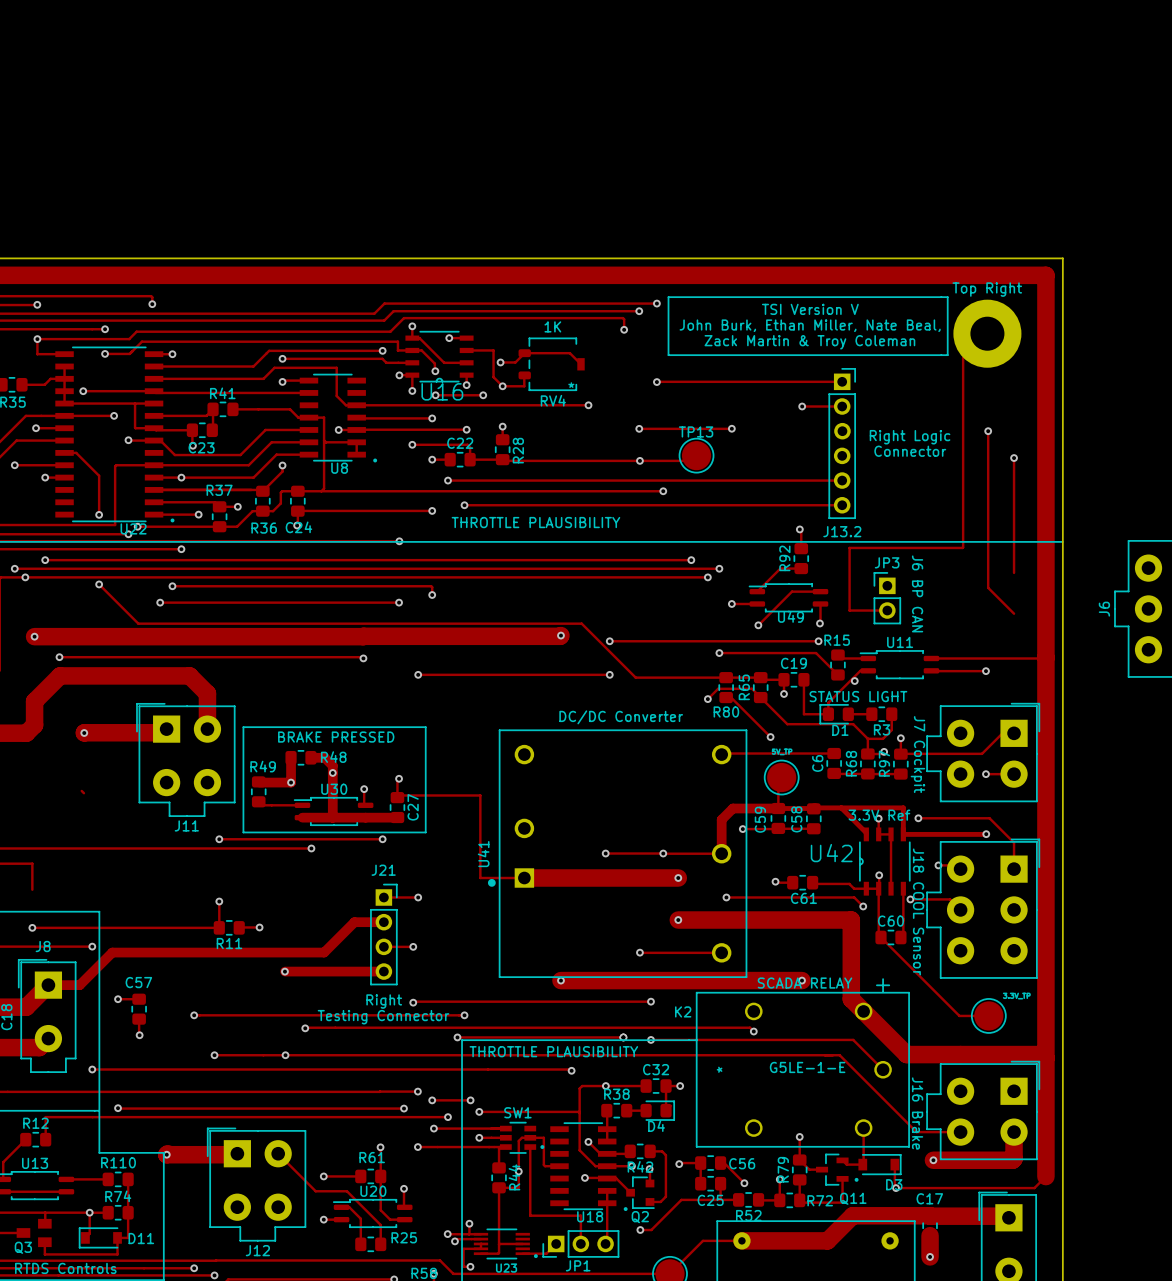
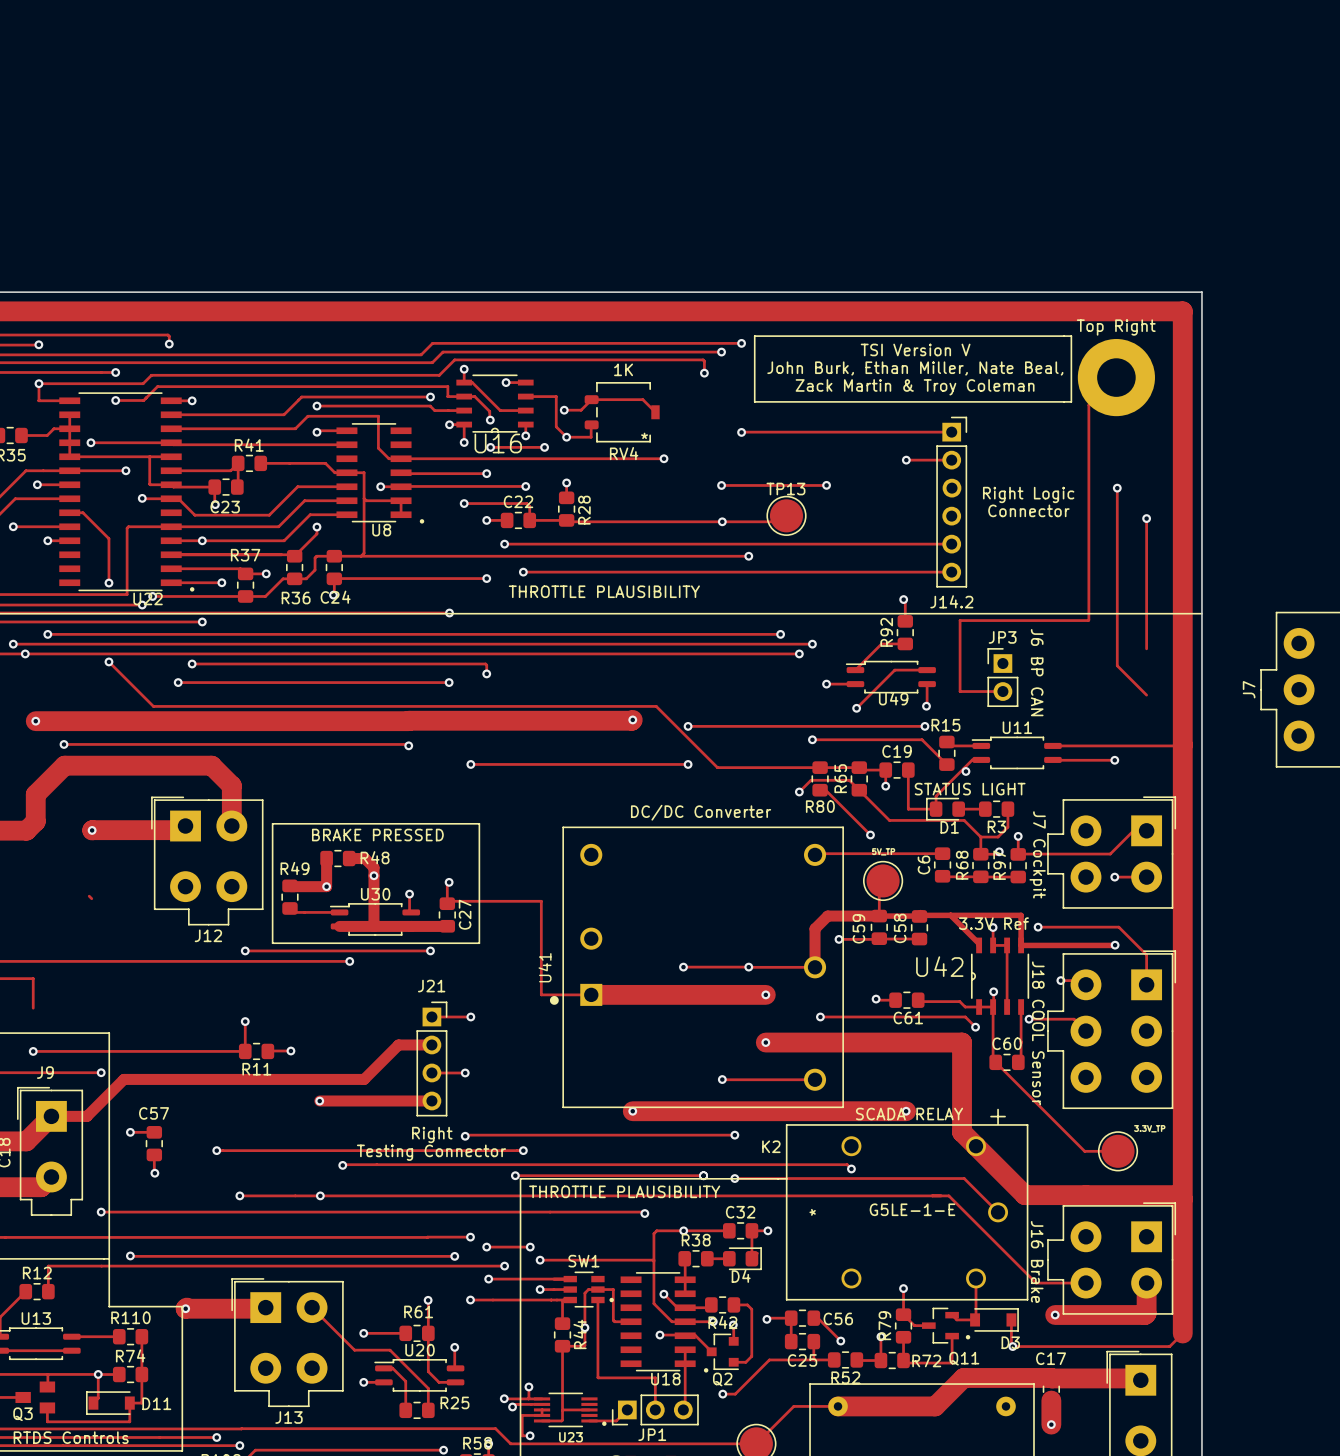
J13.2 name: J13.2 (842, 531) -> J14.2 (951, 601)
J6 name: J6 (1104, 609) -> J7 (1249, 689)
J11 name: J11 (186, 825) -> J12 (208, 935)
J8 name: J8 (43, 946) -> J9 (45, 1072)
J12 name: J12 (257, 1250) -> J13 (289, 1417)

